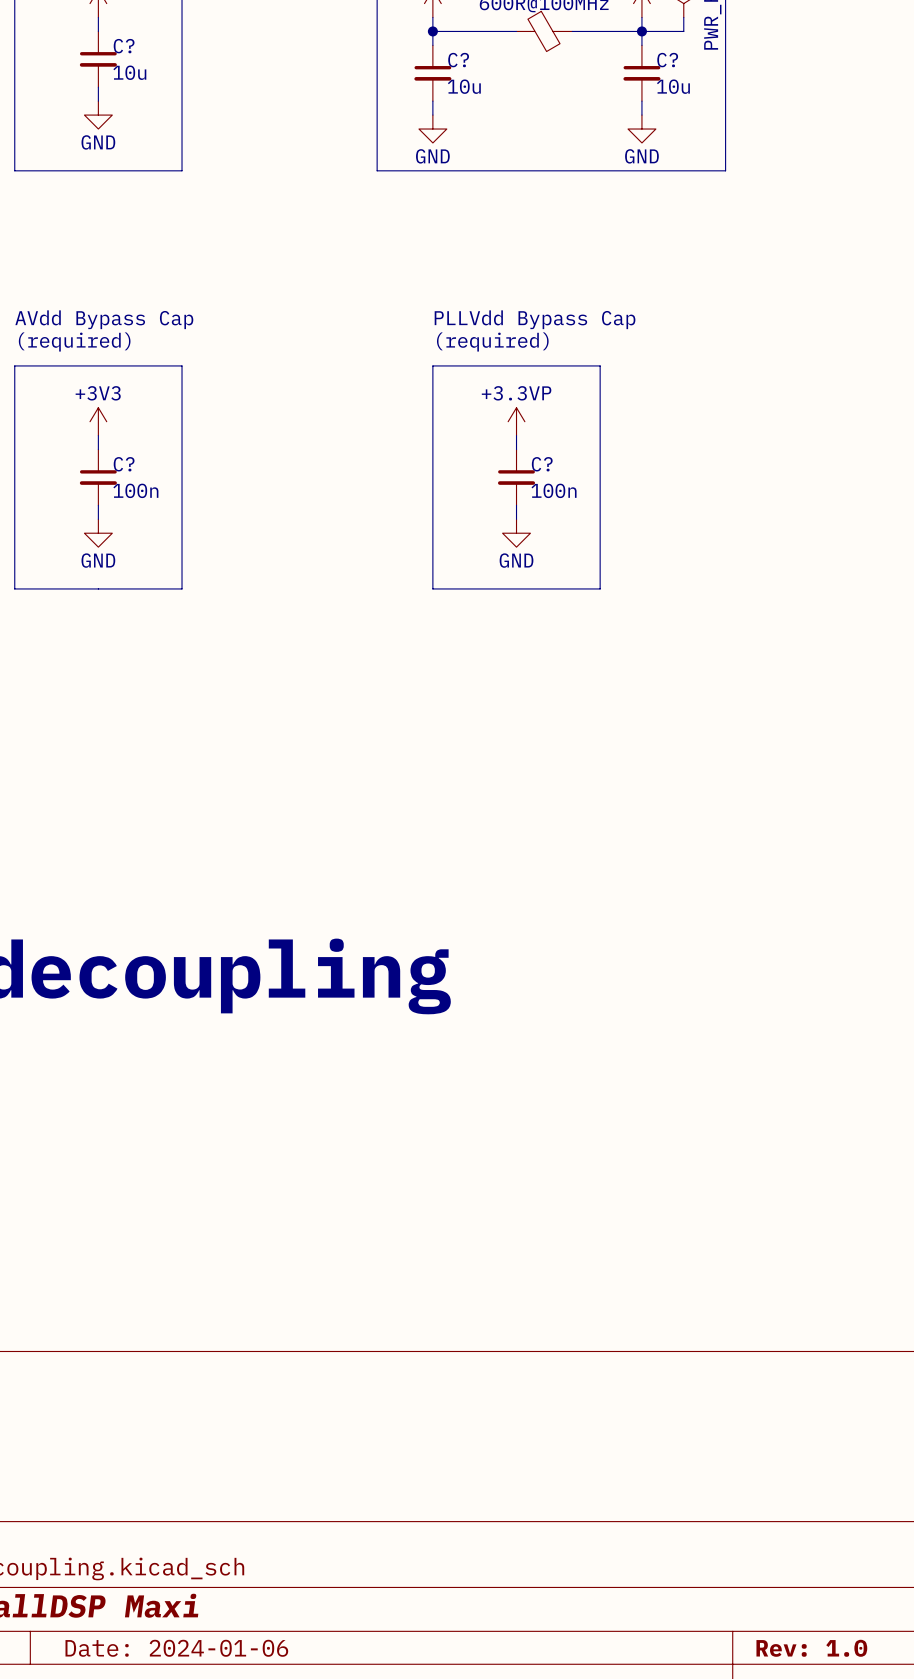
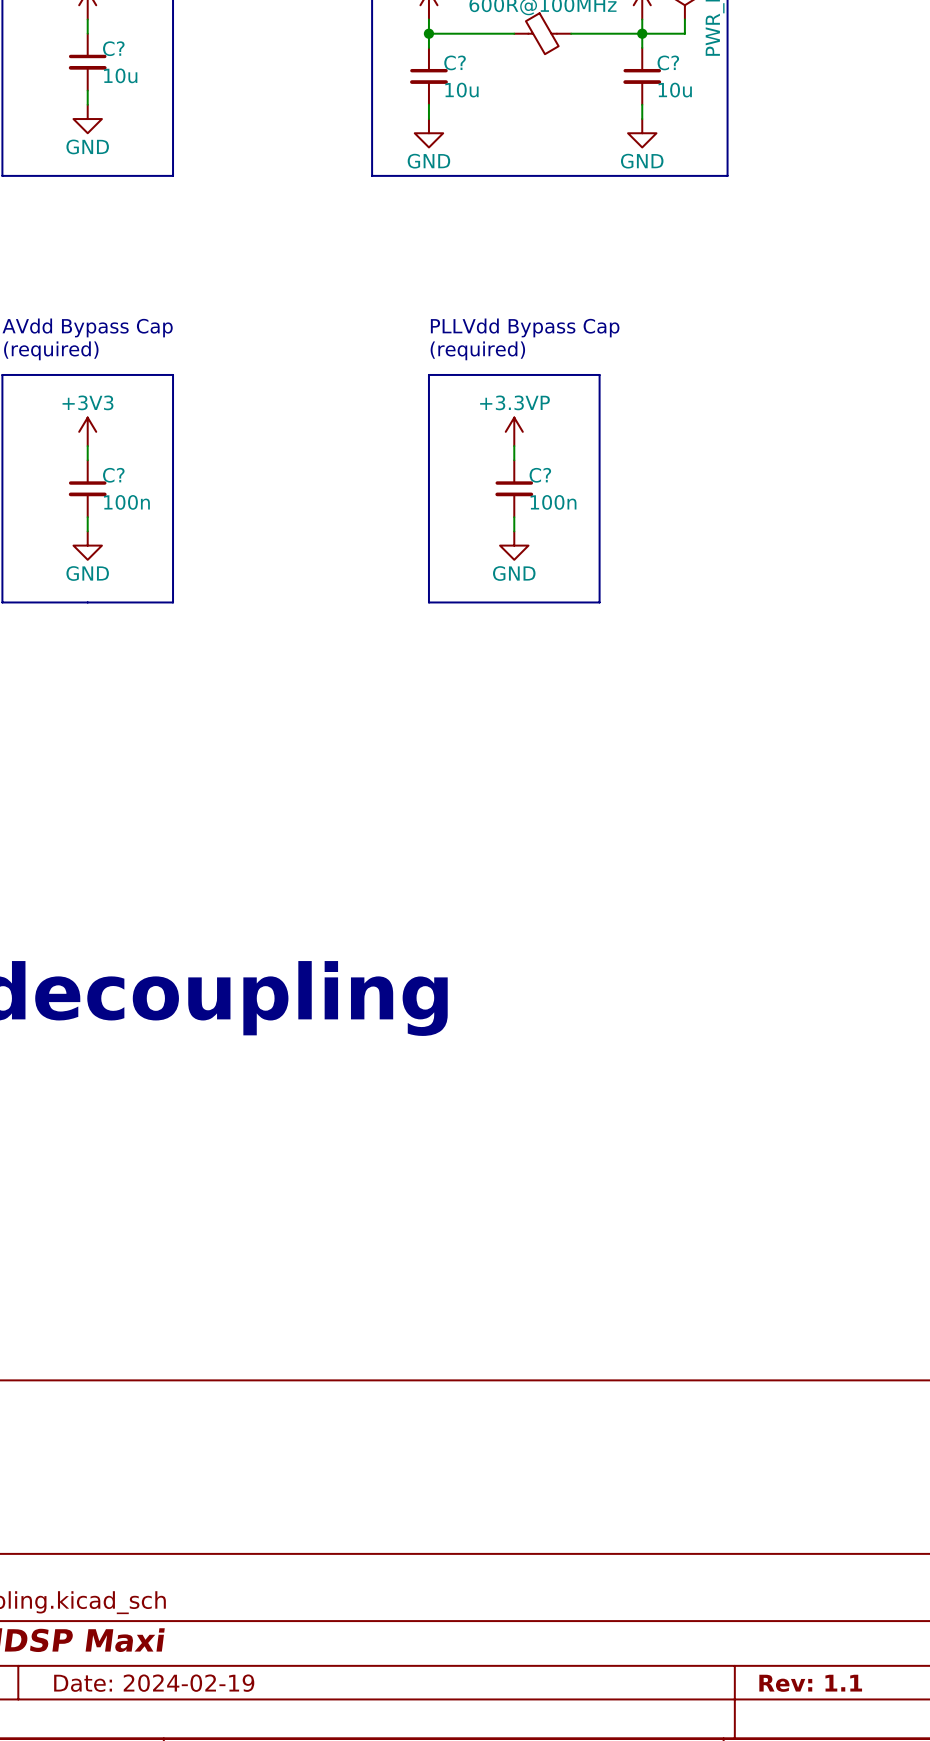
title block: Date: 2024-01-06 (176, 1648) -> Date: 2024-02-19 (154, 1683)
title block: Rev: 1.0 (811, 1648) -> Rev: 1.1 (810, 1683)

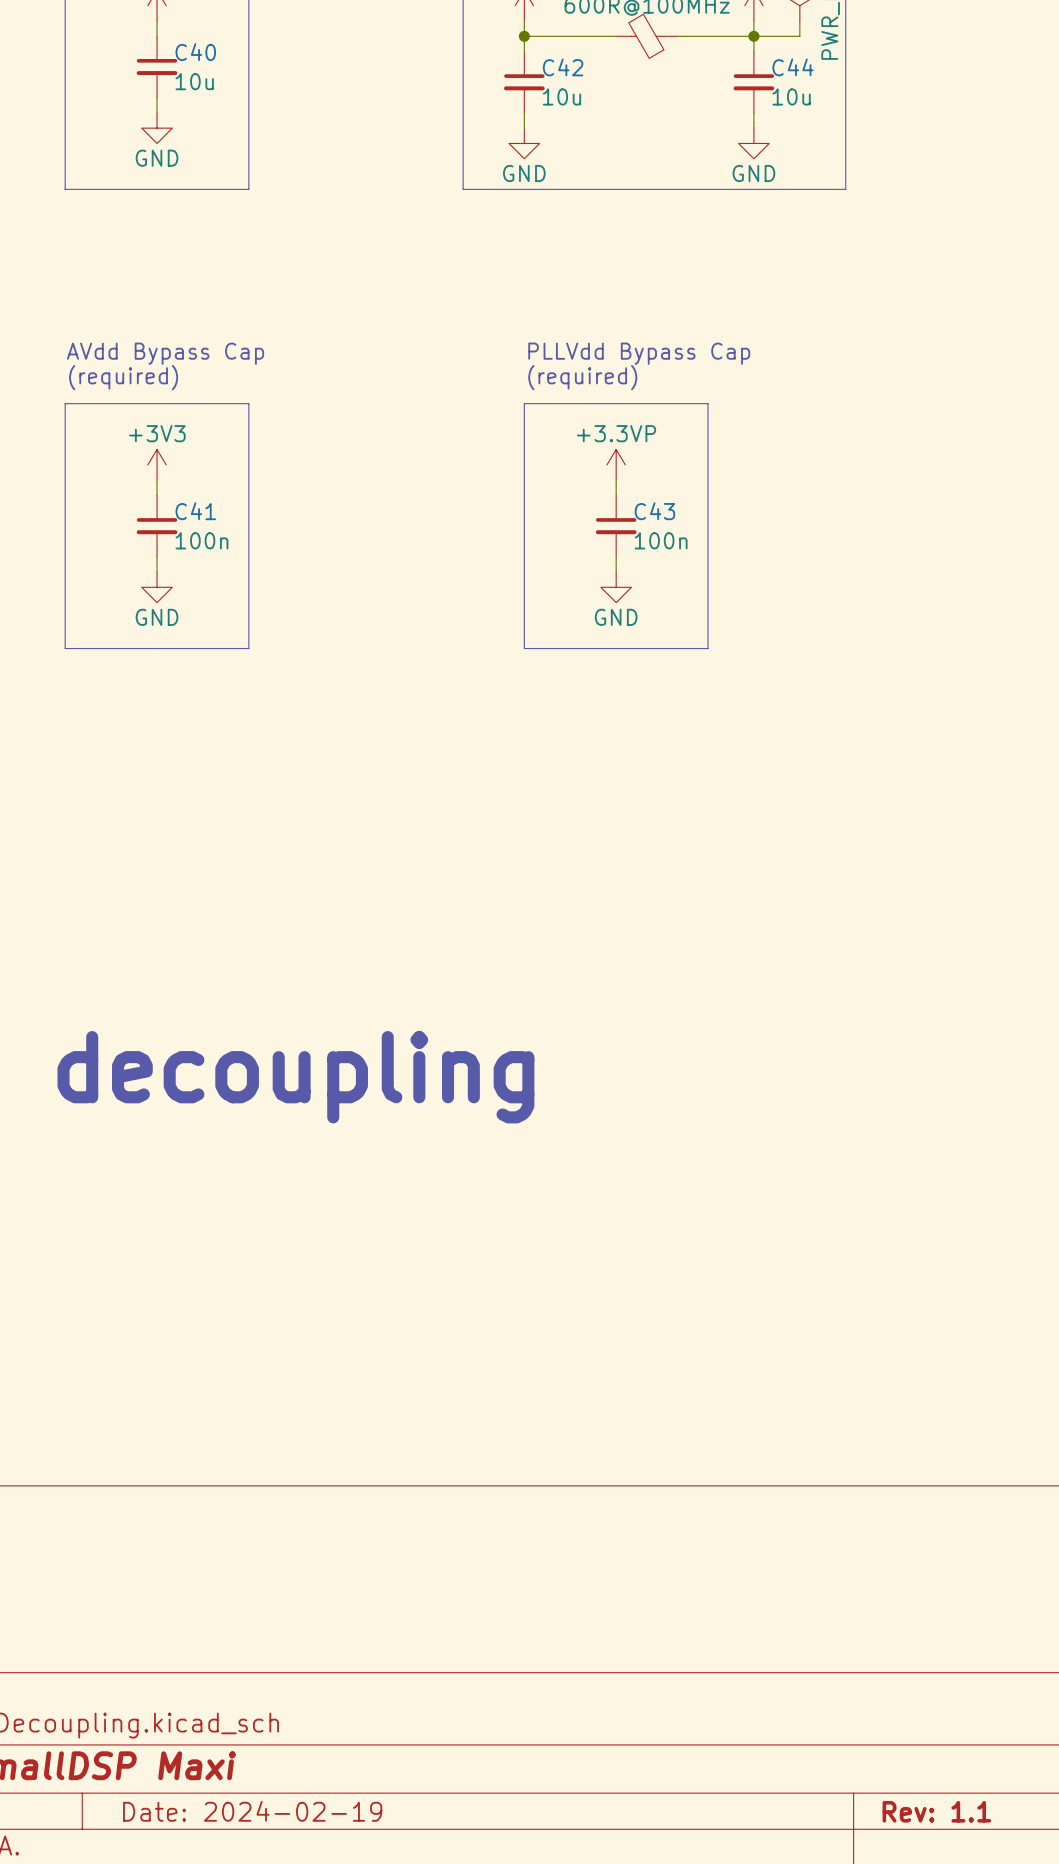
C? name: C? (113, 48) -> C40 (195, 52)
C? name: C? (455, 62) -> C42 (563, 67)
C? name: C? (668, 62) -> C44 (793, 67)
C? name: C? (113, 475) -> C41 (195, 511)
C? name: C? (540, 475) -> C43 (654, 511)

